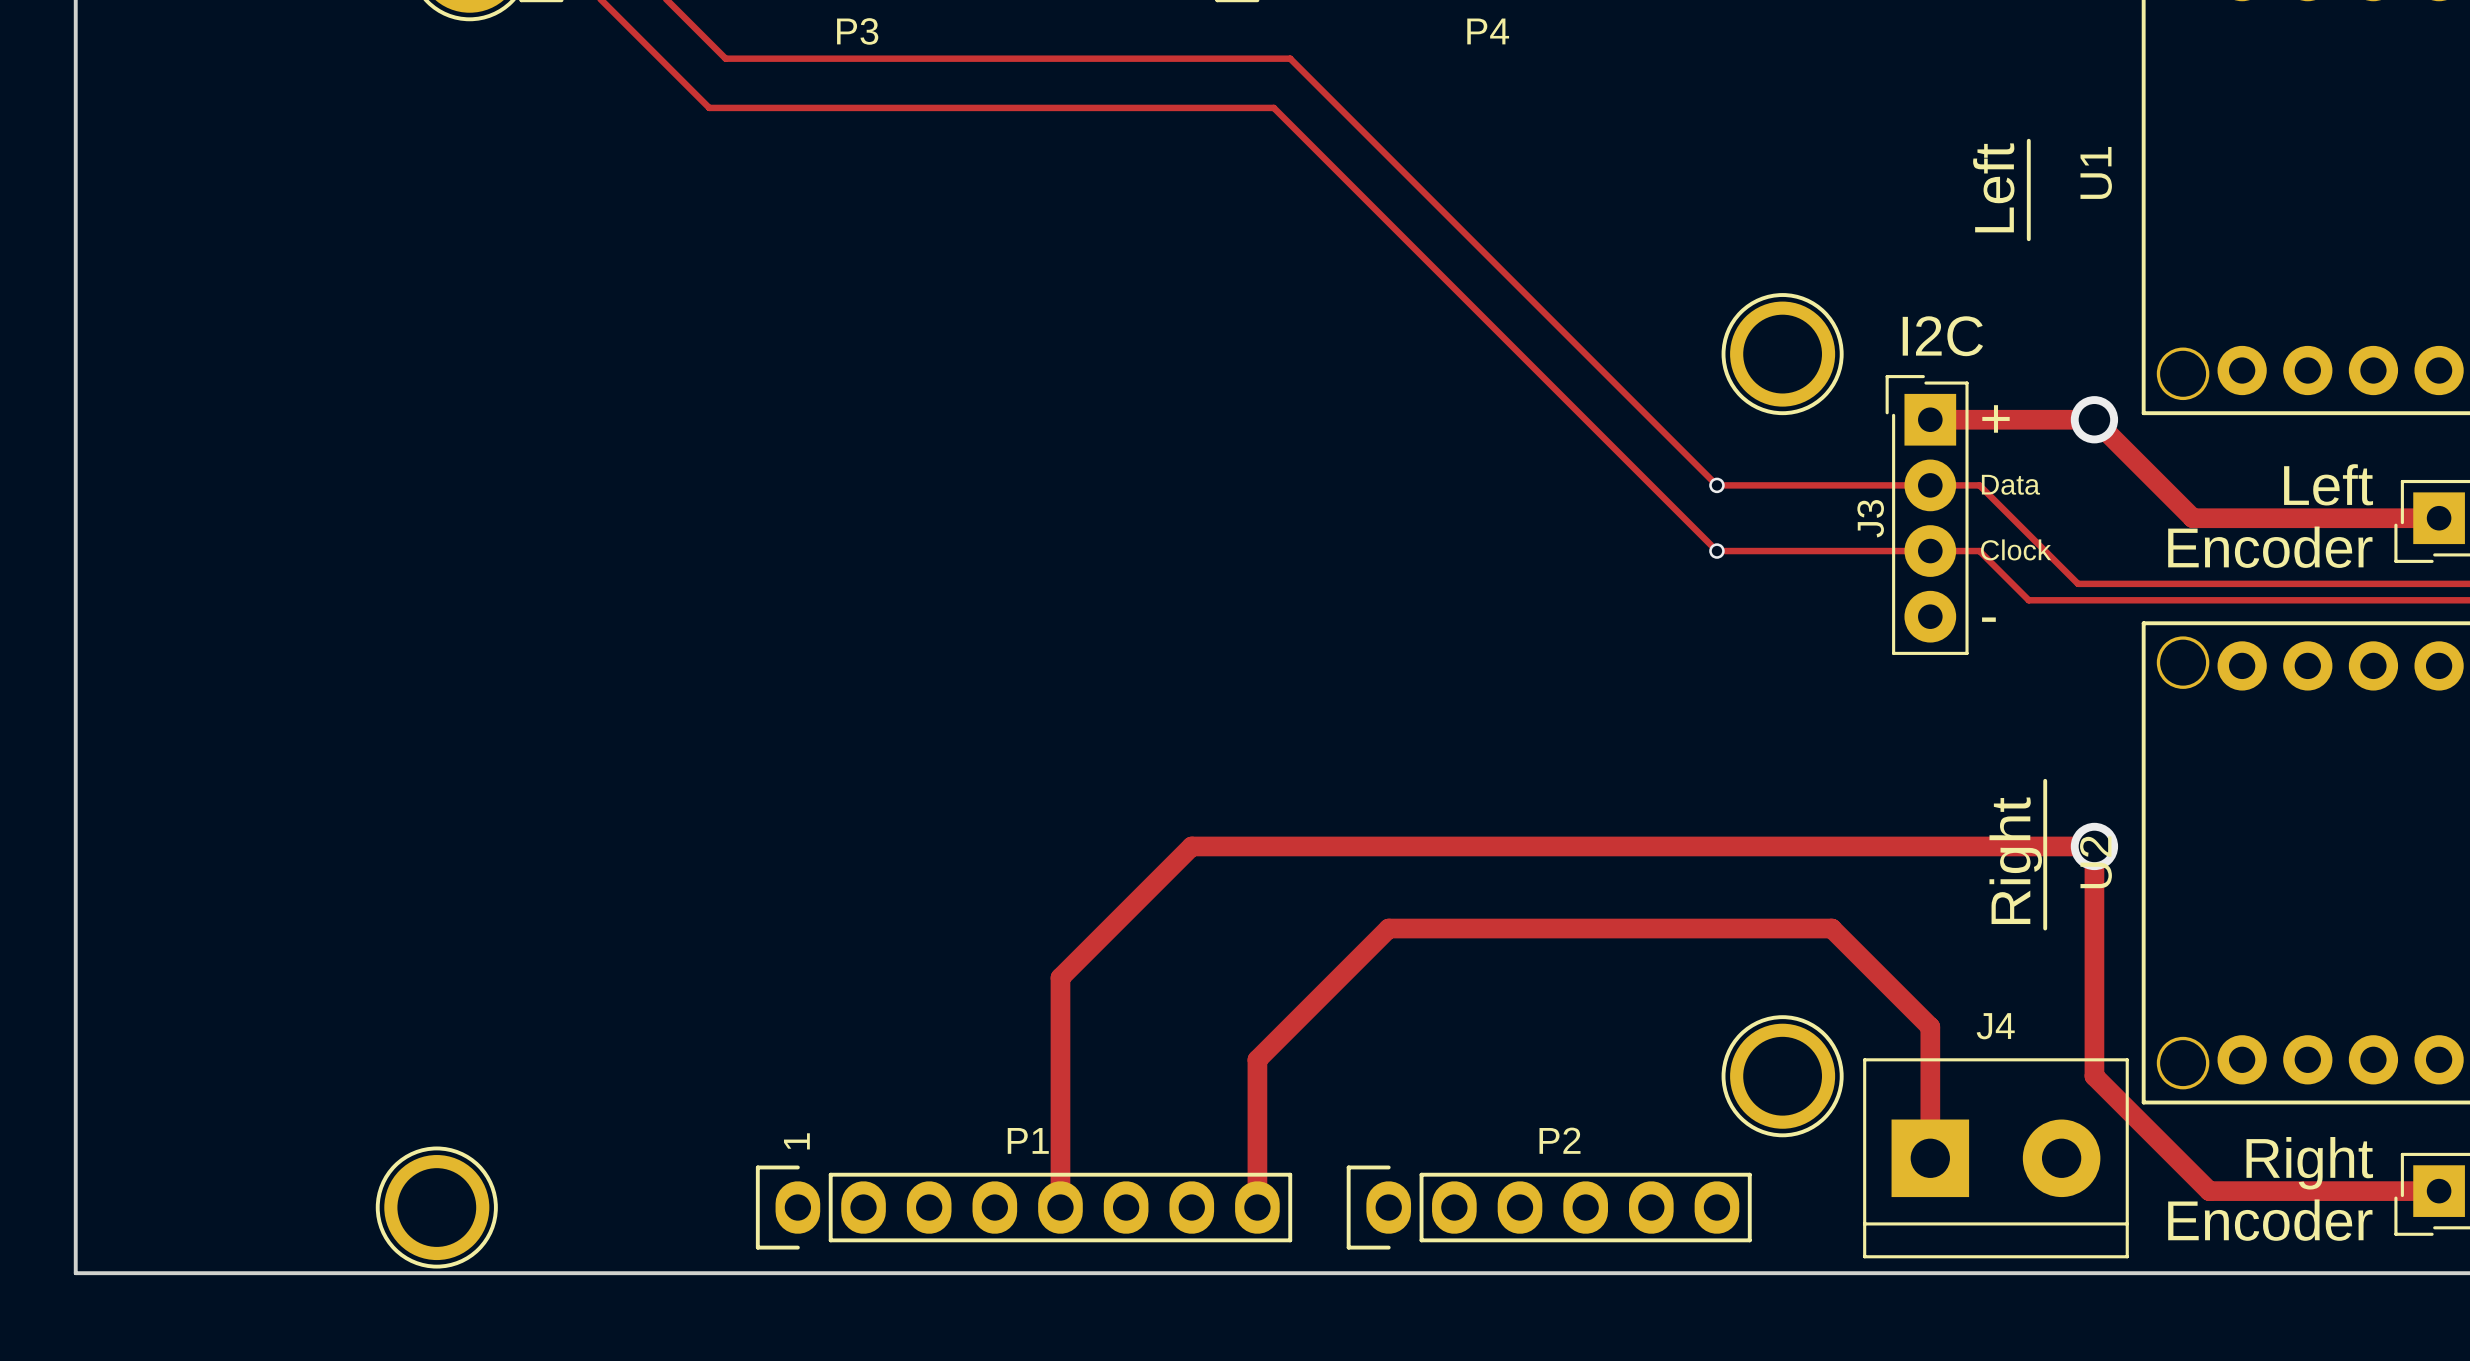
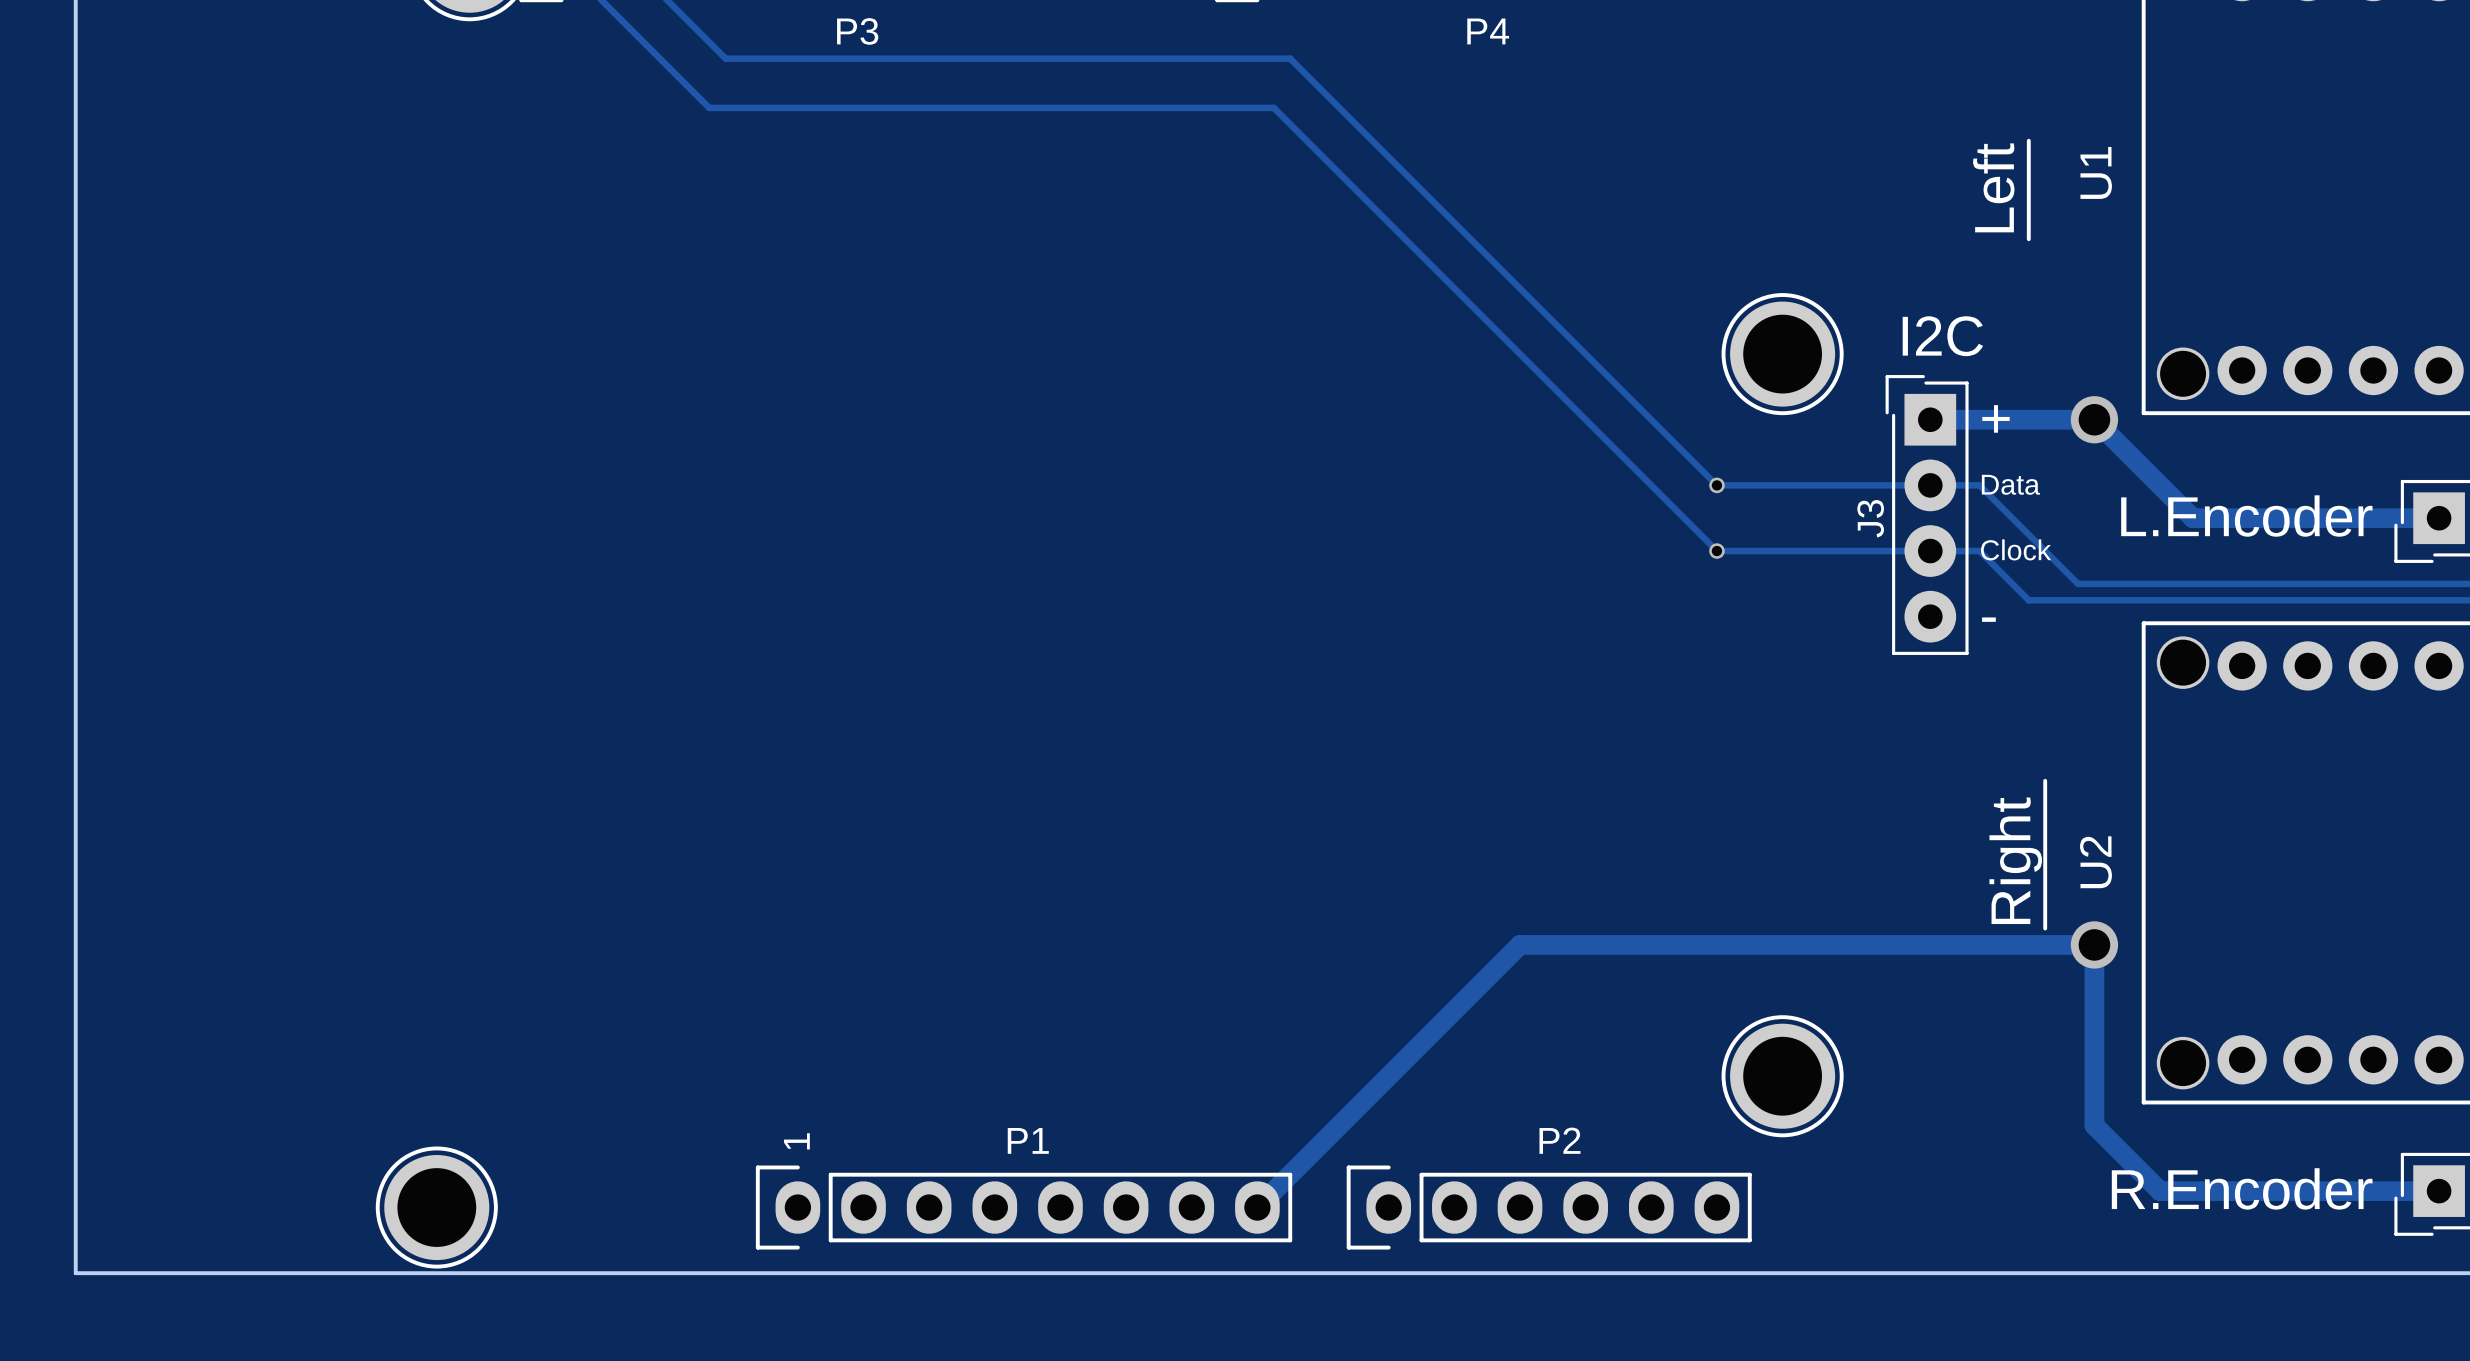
text: Left (2328, 484) -> none
text: Encoder (2270, 547) -> L.Encoder (2246, 516)
via position: (2094, 846) -> (2094, 944)
track: (2094, 944) (2094, 846) (1191, 846) (1060, 977) (1060, 1207) -> (2094, 944) (1520, 944) (1257, 1207)
track: (2094, 1076) (2209, 1191) -> (2094, 1076) (2094, 1125) (2160, 1191) (2209, 1191)
track: (1930, 1158) (1930, 1027) (1831, 928) (1388, 928) (1257, 1059) (1257, 1207) -> none
J4: (1995, 1158) -> none
text: Right (2309, 1163) -> none
text: Encoder (2270, 1220) -> R.Encoder (2242, 1188)

